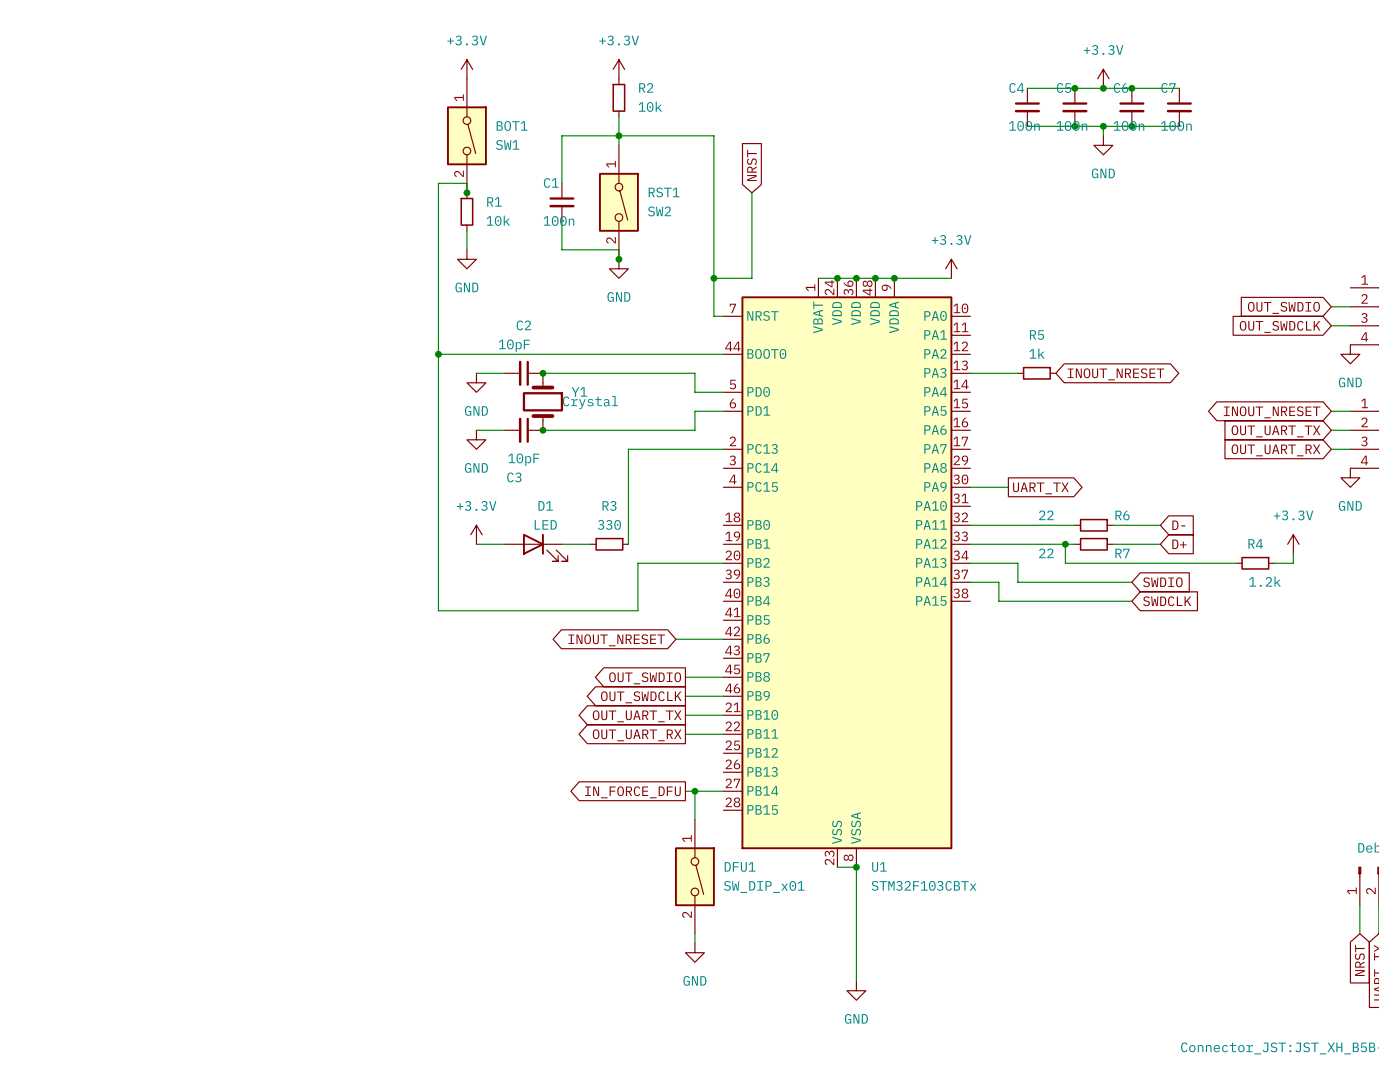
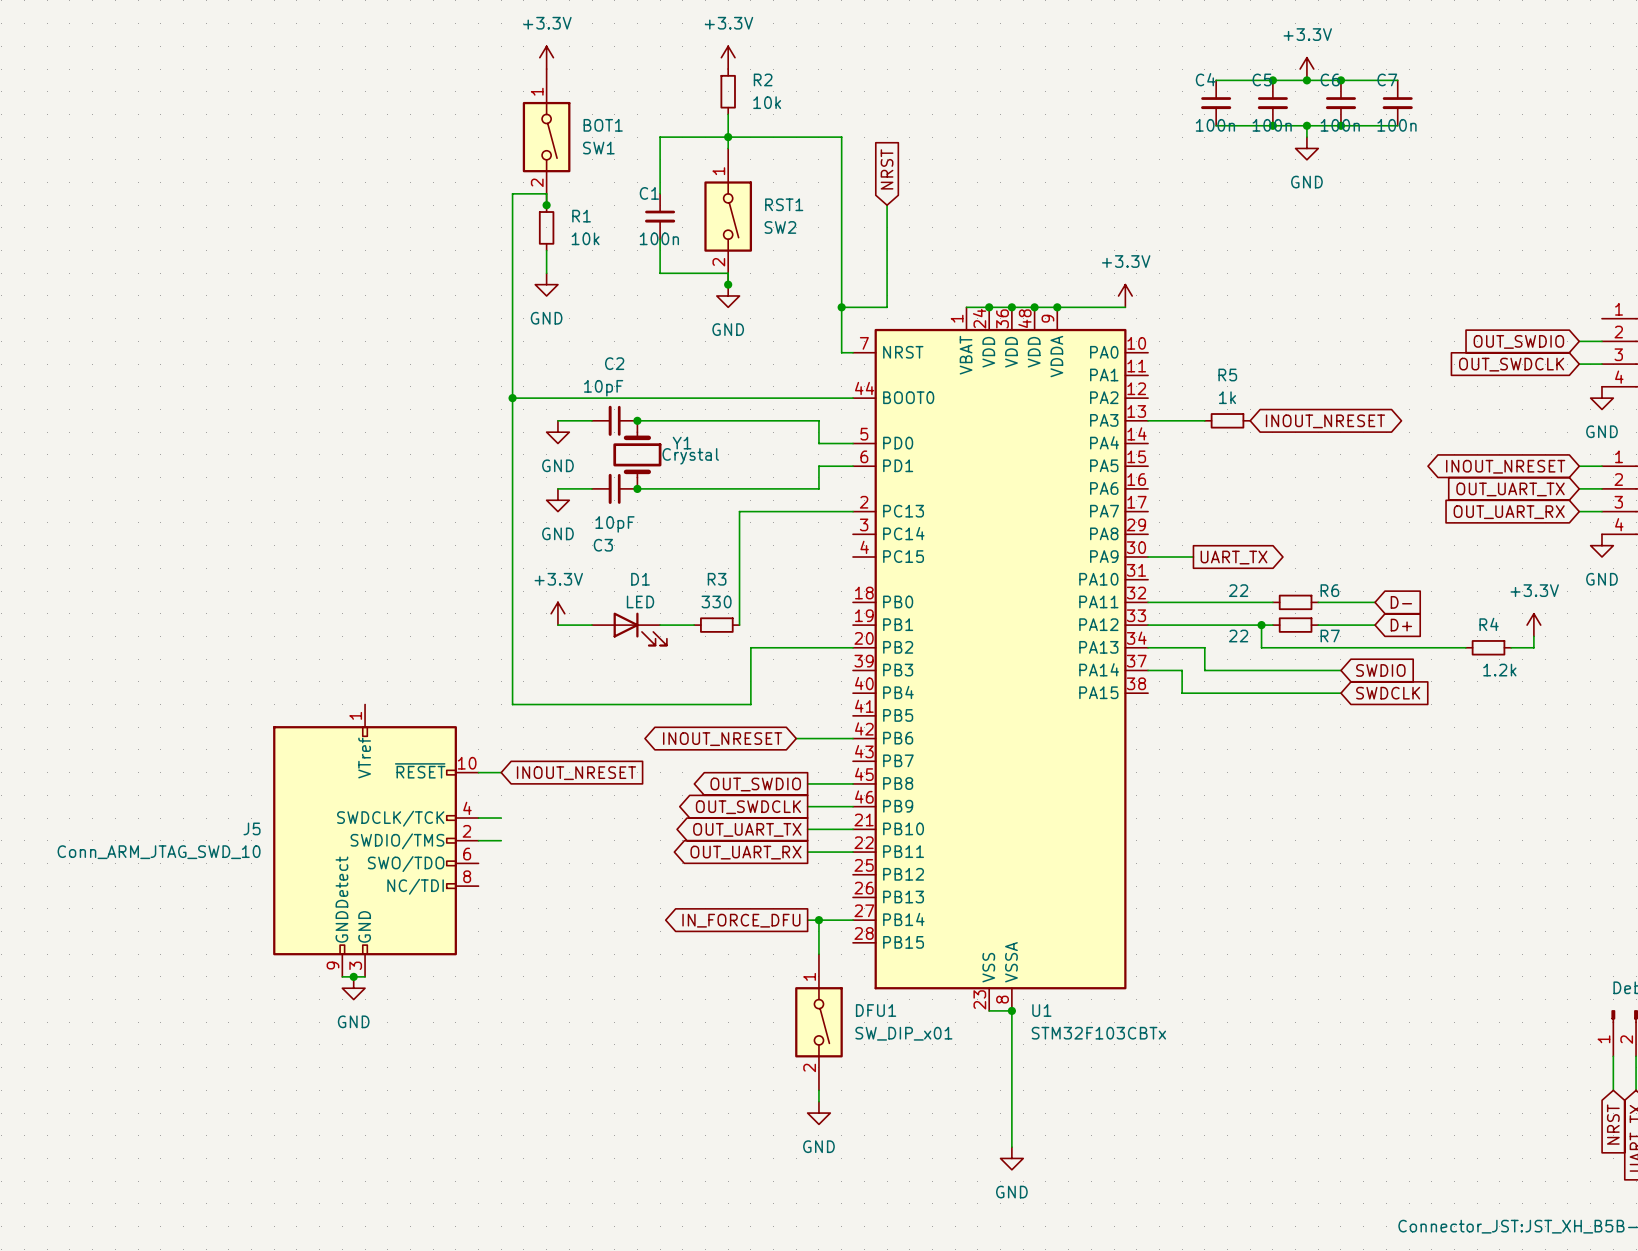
wire: none -> (478, 772) (501, 772)
global label: none -> INOUT_NRESET (576, 773)
wire: none -> (478, 818) (501, 818)
J5: none -> Conn_ARM_JTAG_SWD_10 (375, 840)
wire: none -> (478, 840) (501, 840)
wire: none -> (342, 976) (365, 976)
junction: none -> (353, 976)
power symbol: none -> GND (353, 988)

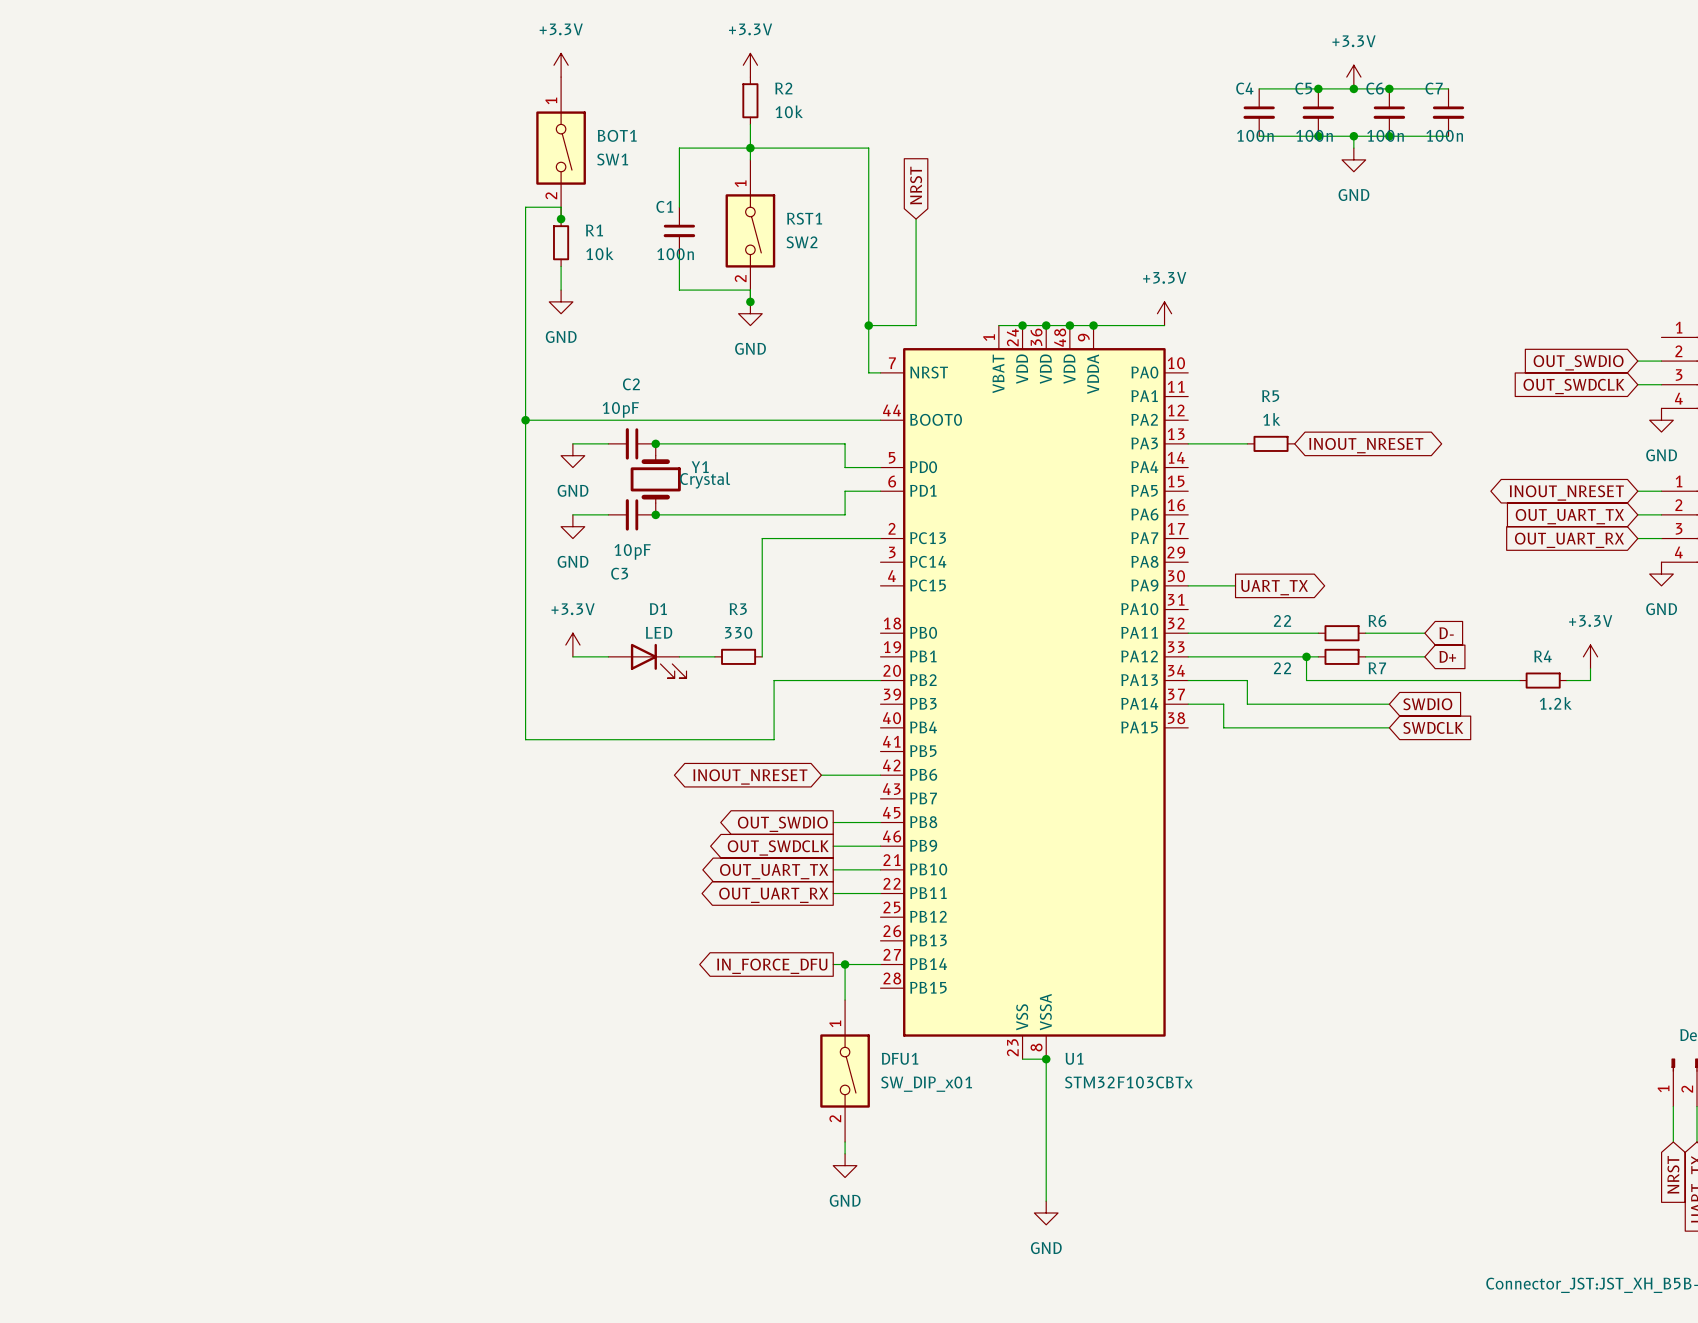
wire: (478, 772) (501, 772) -> none
global label: INOUT_NRESET (576, 773) -> none
wire: (478, 818) (501, 818) -> none
J5: Conn_ARM_JTAG_SWD_10 (375, 840) -> none
wire: (478, 840) (501, 840) -> none
wire: (342, 976) (365, 976) -> none
junction: (353, 976) -> none
power symbol: GND (353, 988) -> none

